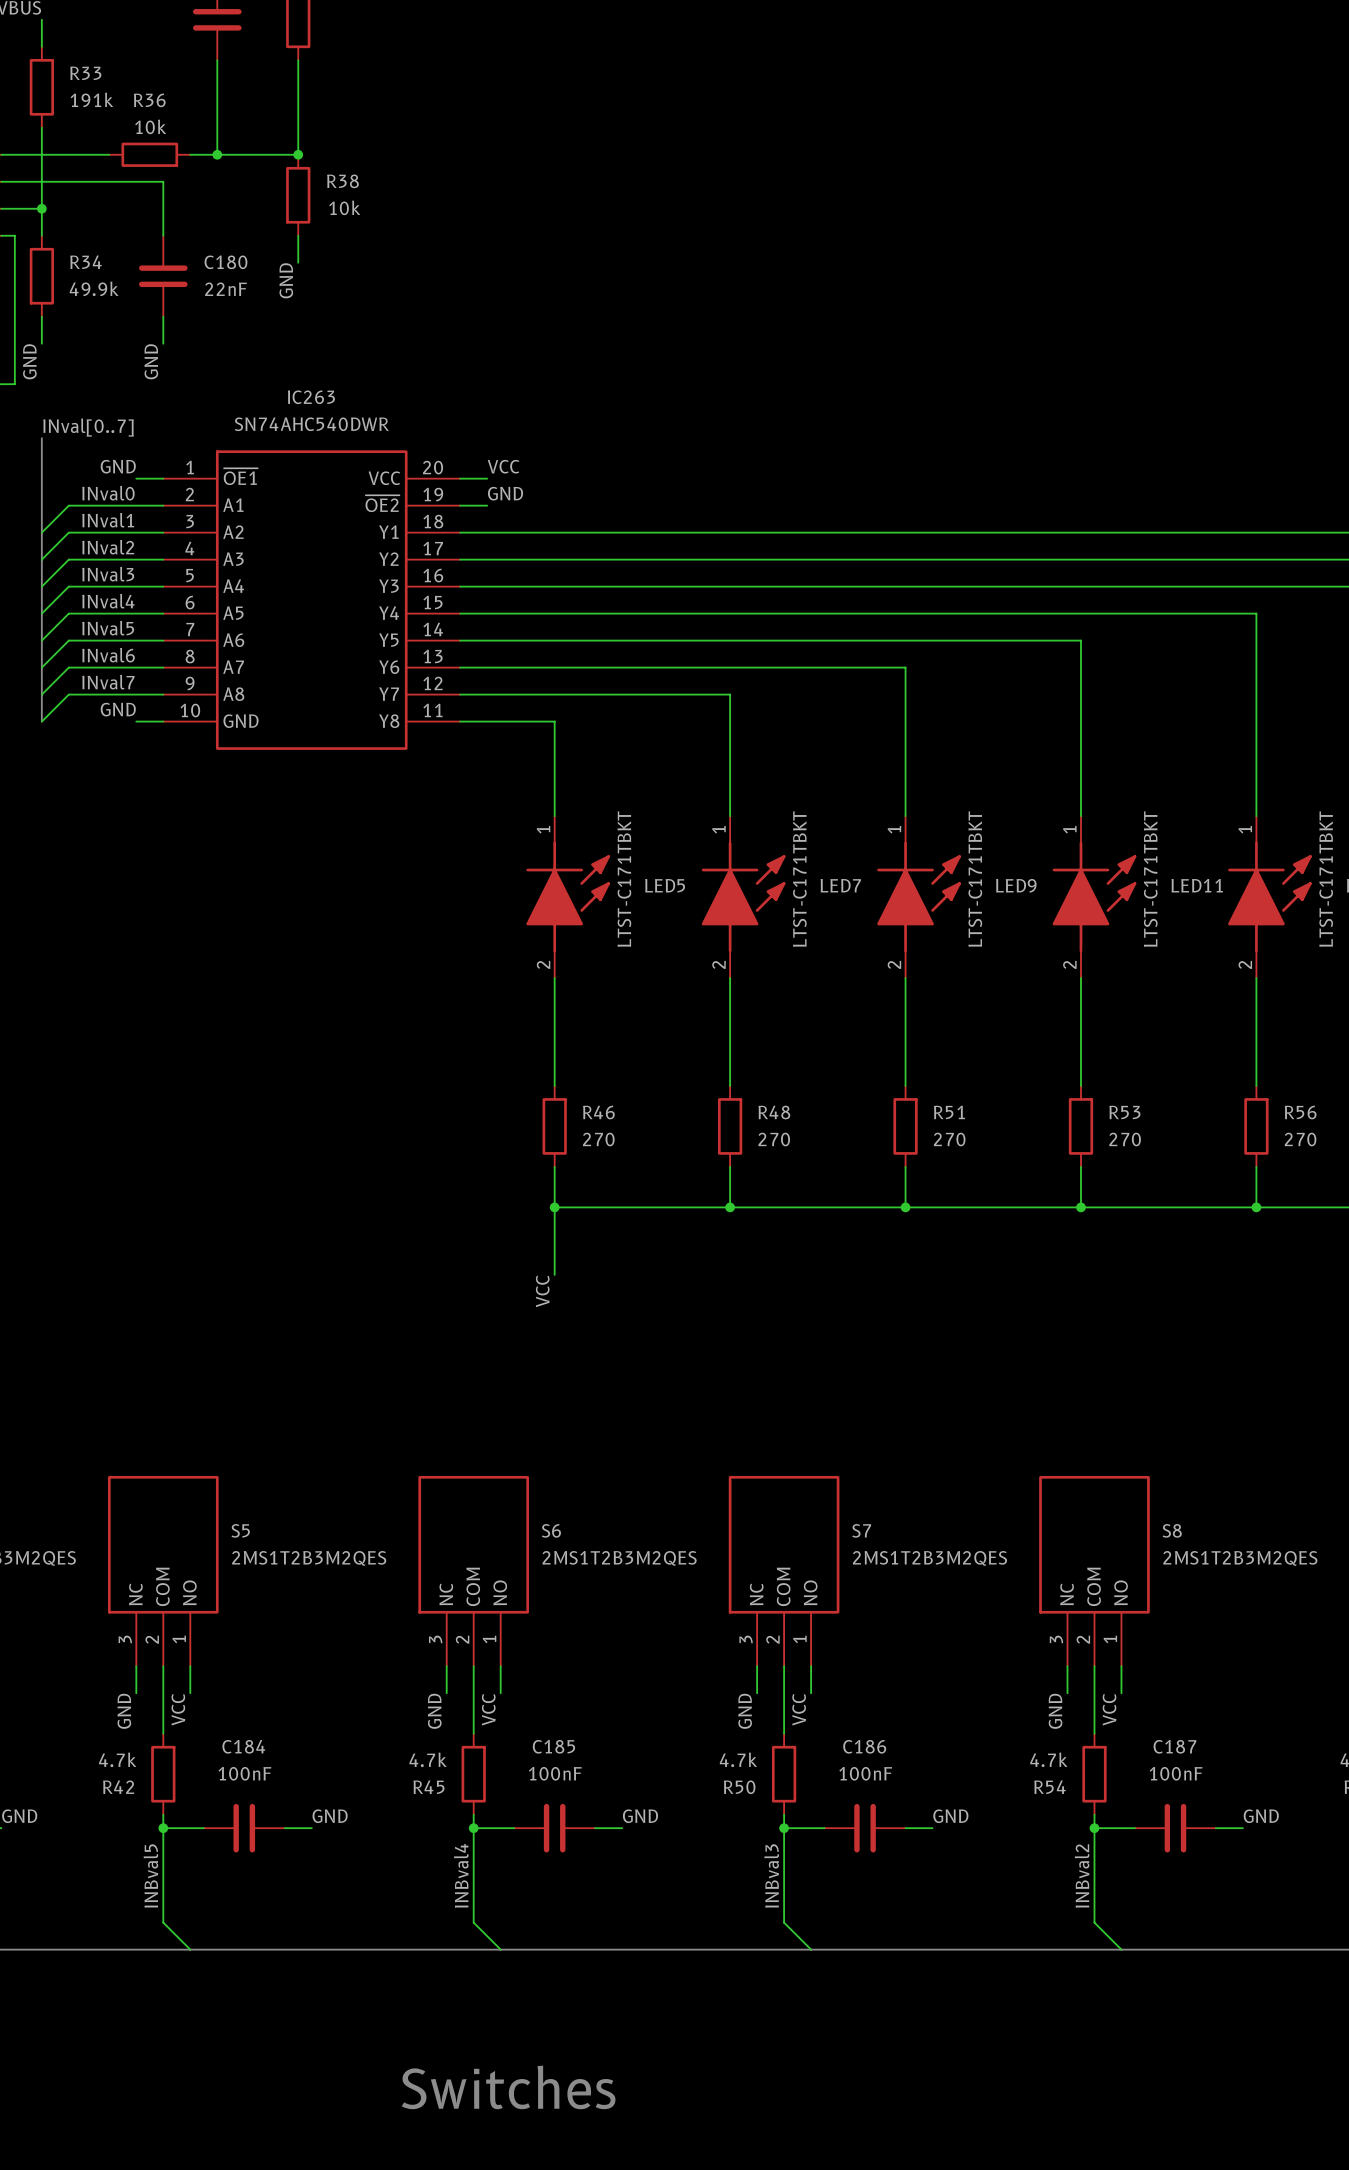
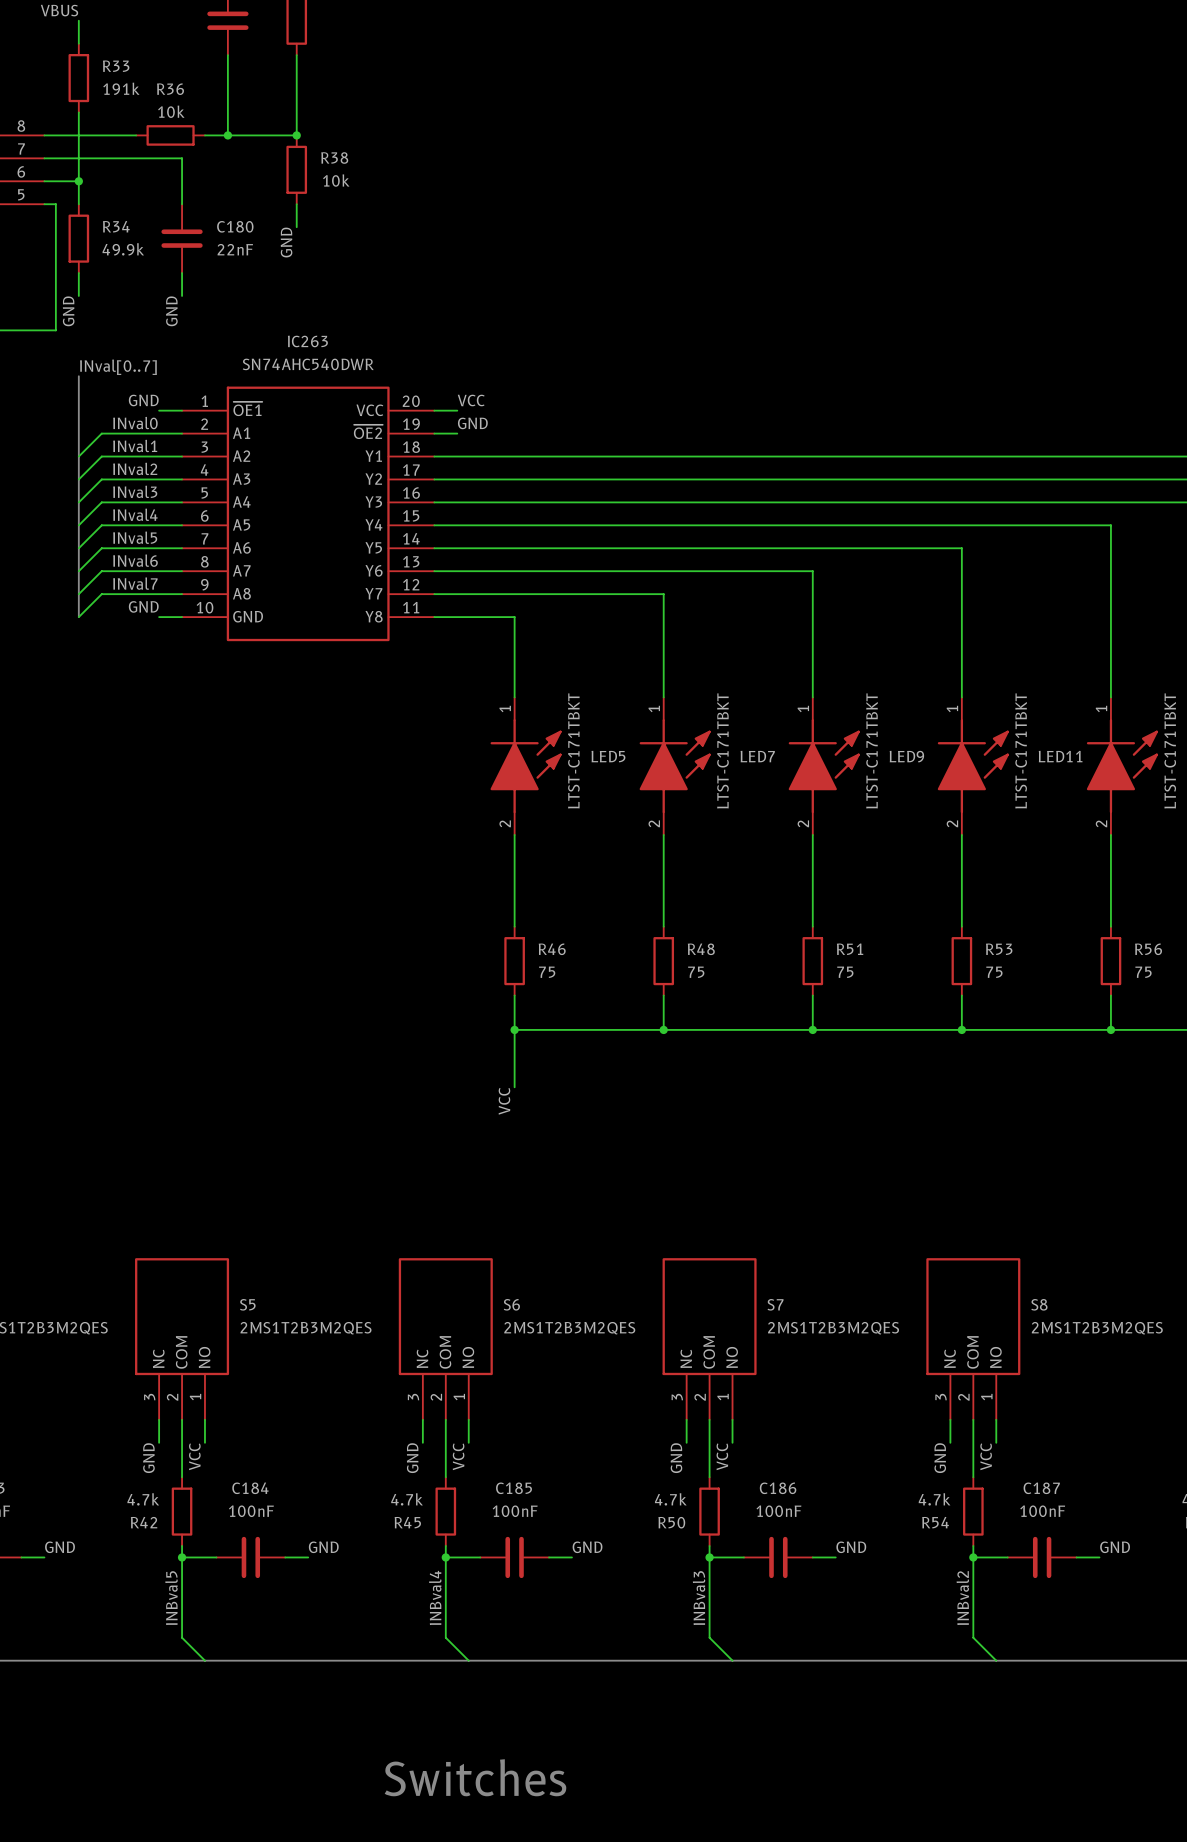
R46 value: 270 (598, 1139) -> 75 (547, 972)
R48 value: 270 (774, 1139) -> 75 (696, 972)
R51 value: 270 (949, 1139) -> 75 (845, 972)
R53 value: 270 (1125, 1139) -> 75 (994, 972)
R56 value: 270 (1300, 1139) -> 75 (1143, 972)

